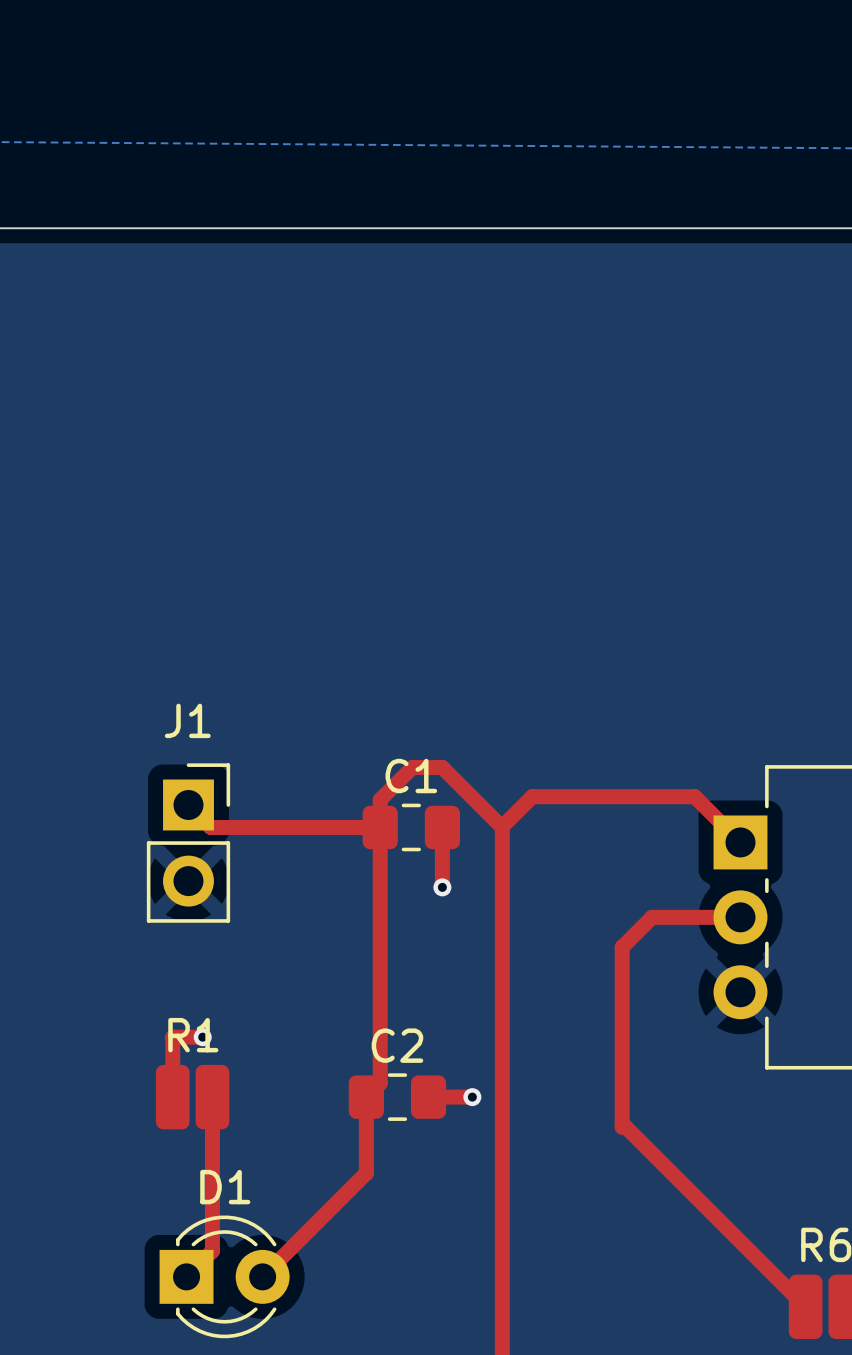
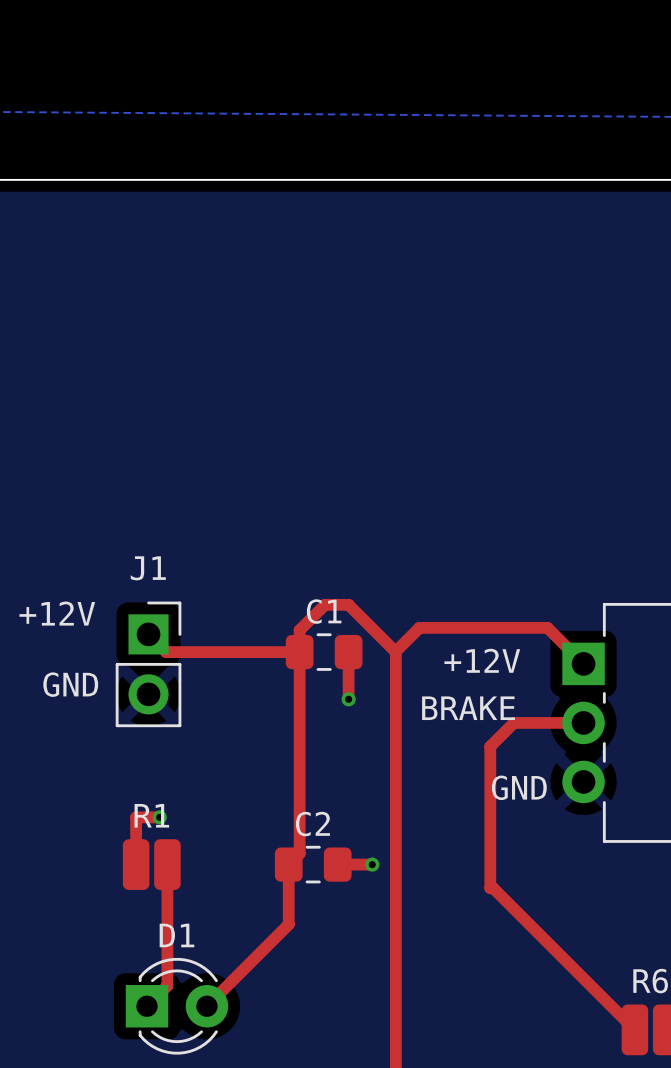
text: none -> +12V (57, 613)
text: none -> +12V (482, 660)
text: none -> GND (70, 684)
text: none -> BRAKE (468, 708)
text: none -> GND (519, 787)

